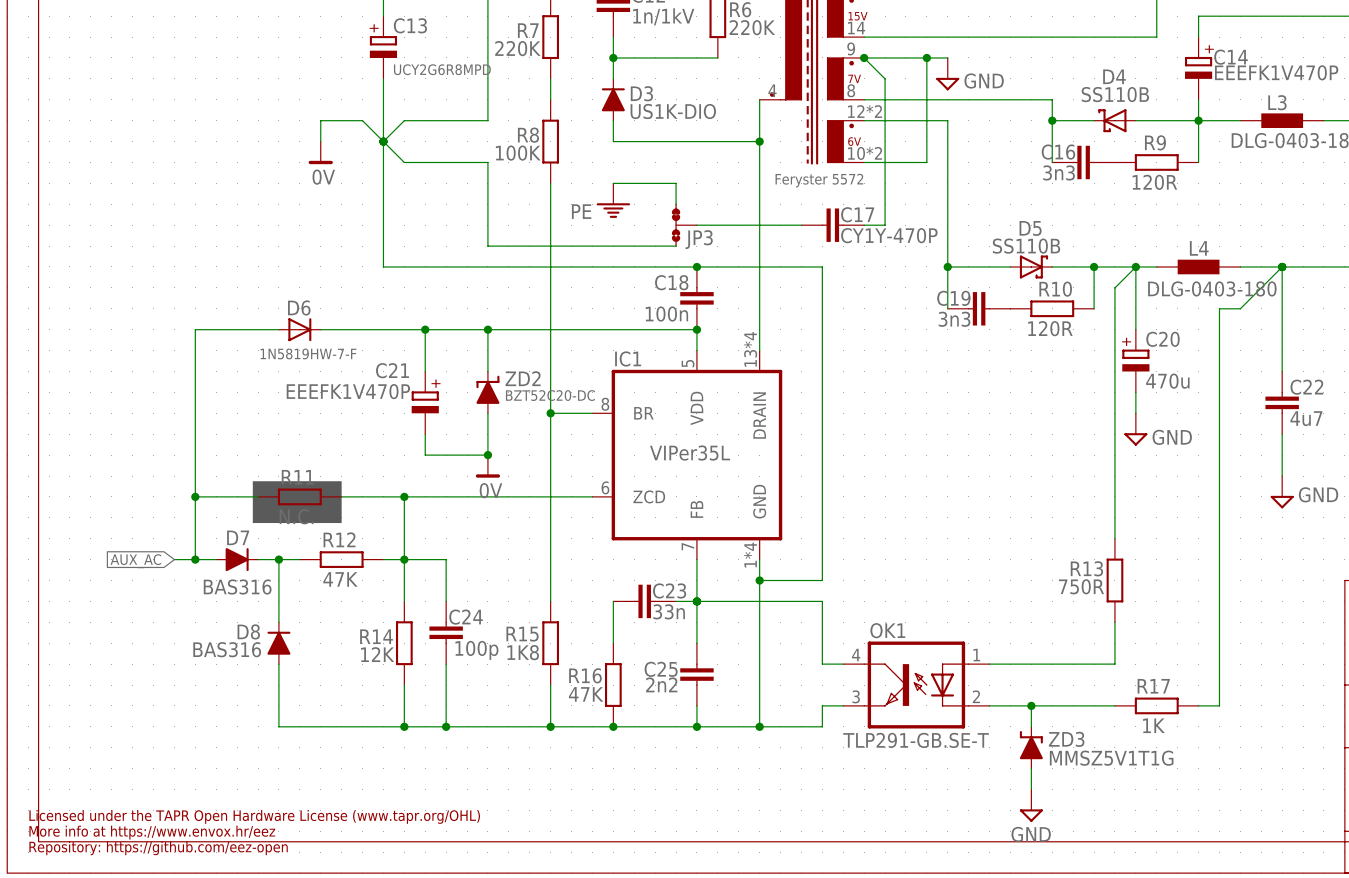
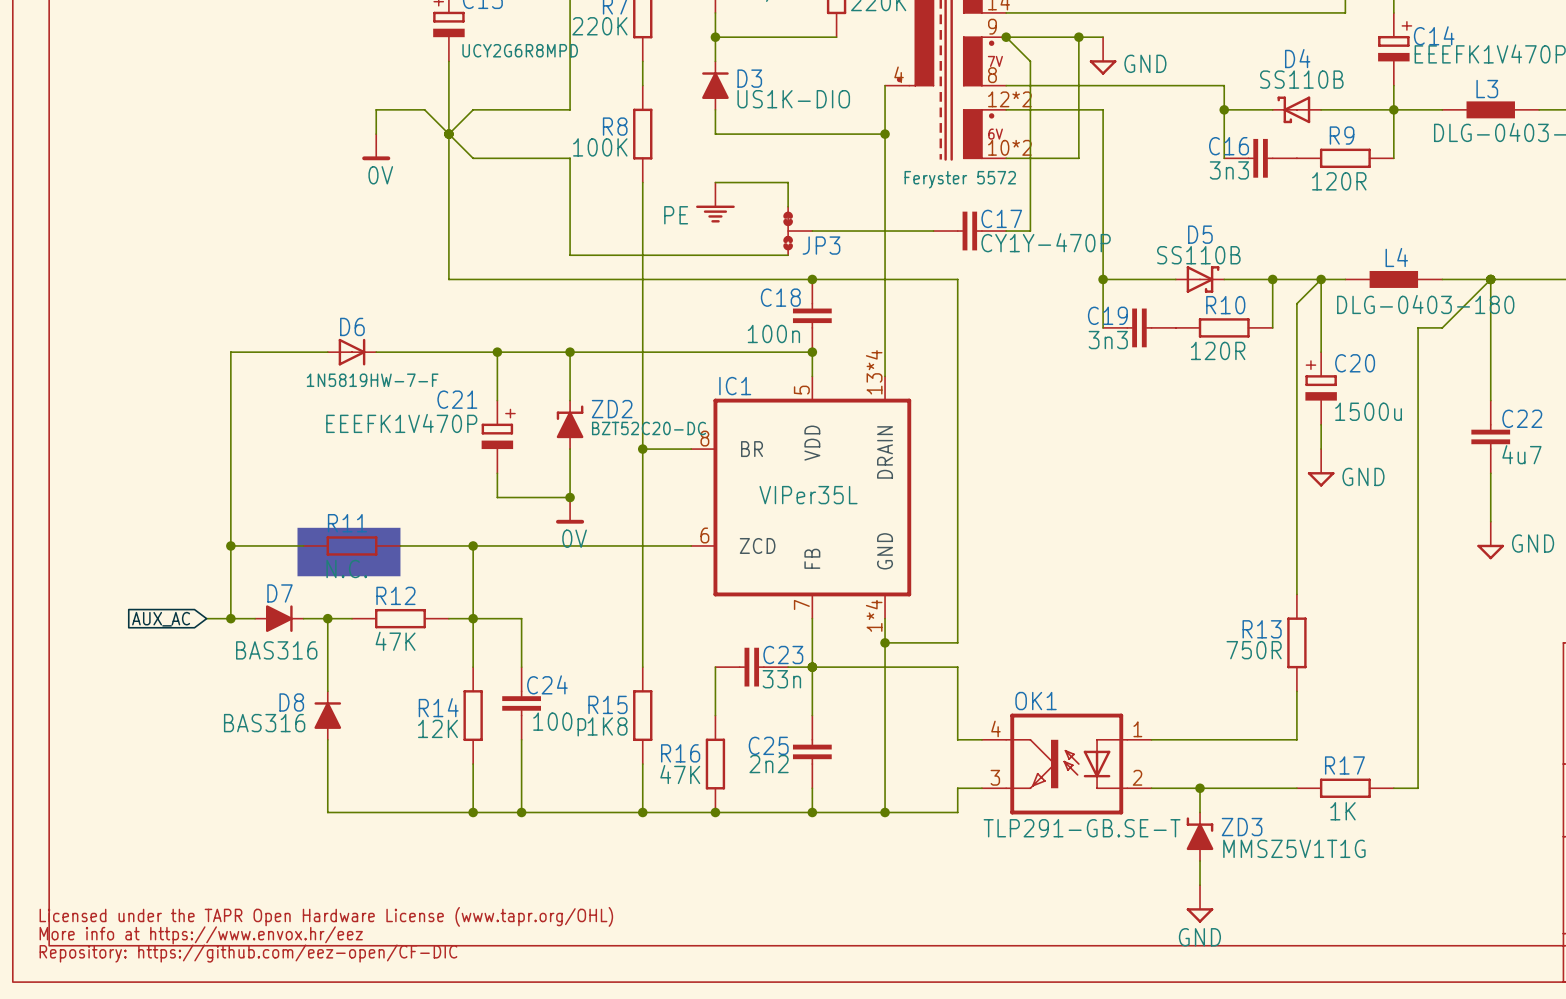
C20 value: 470u (1167, 381) -> 1500u (1368, 411)
text: Repository: https://github.com/eez-open (158, 848) -> Repository: https://github.com/eez-open/CF-DIC (248, 953)

